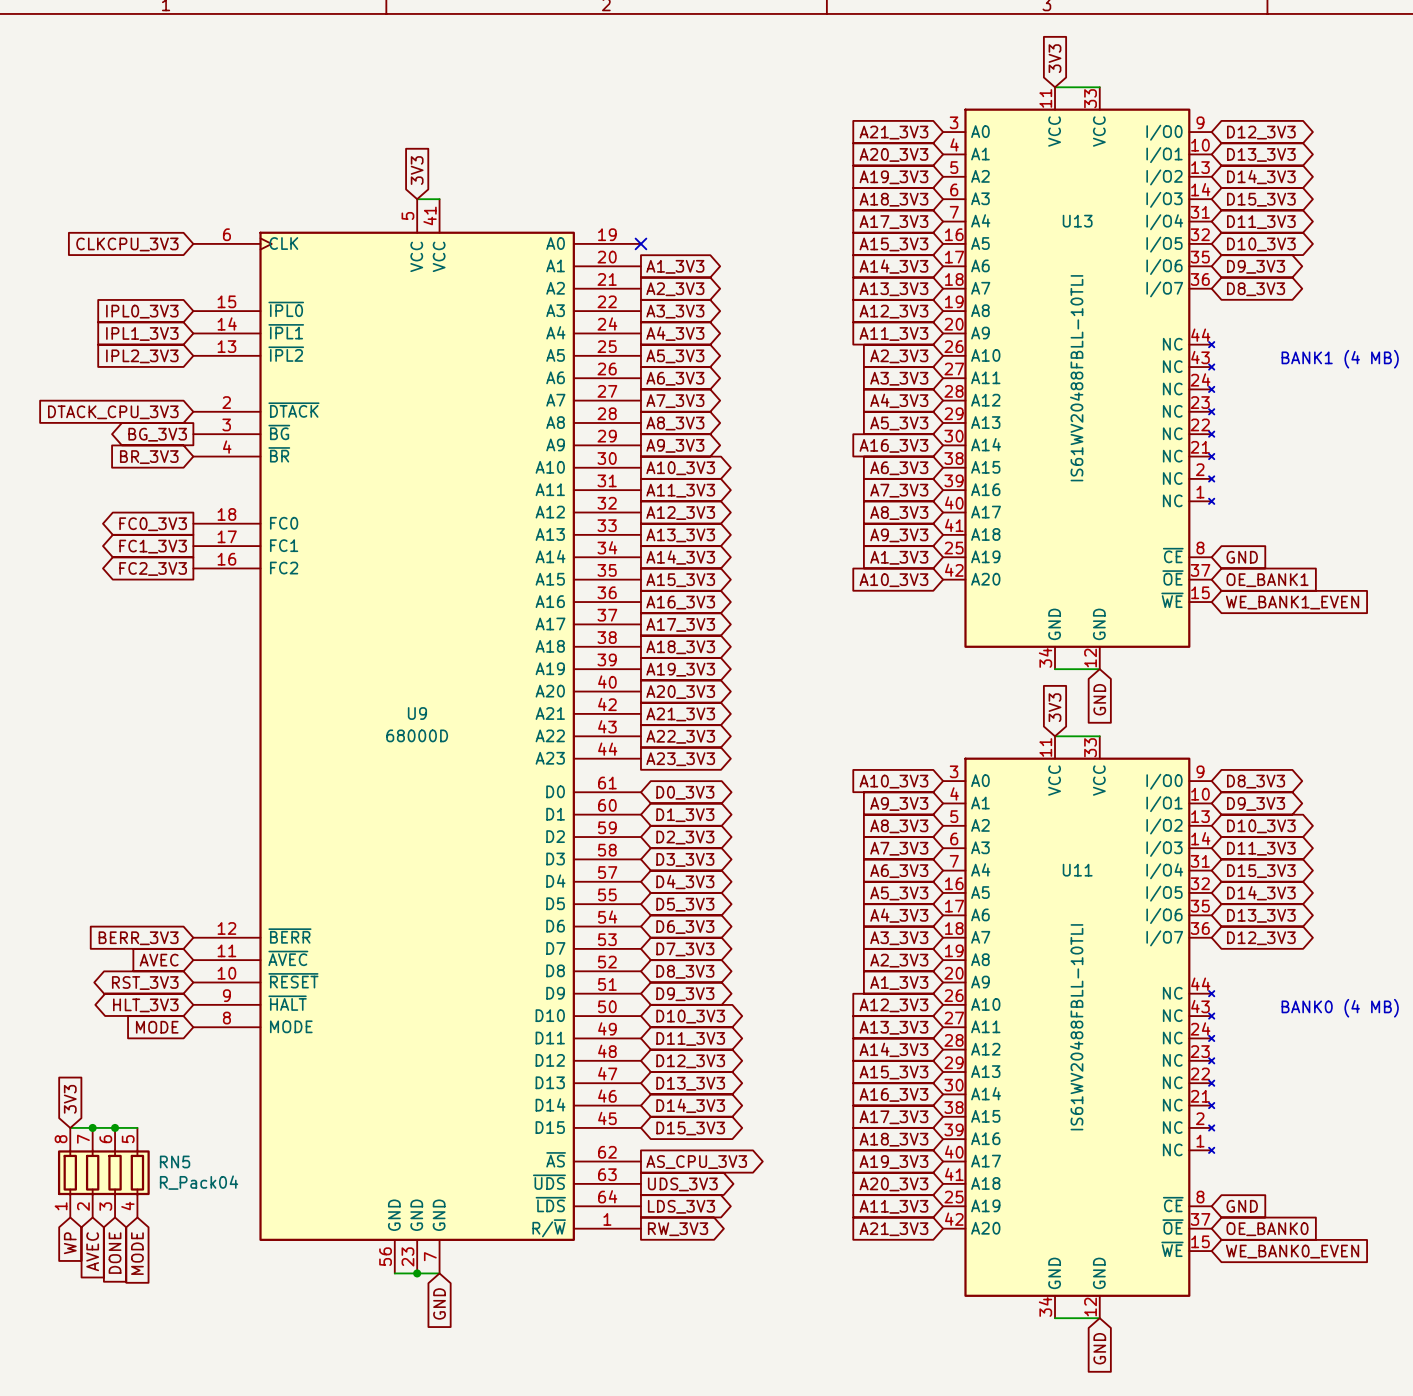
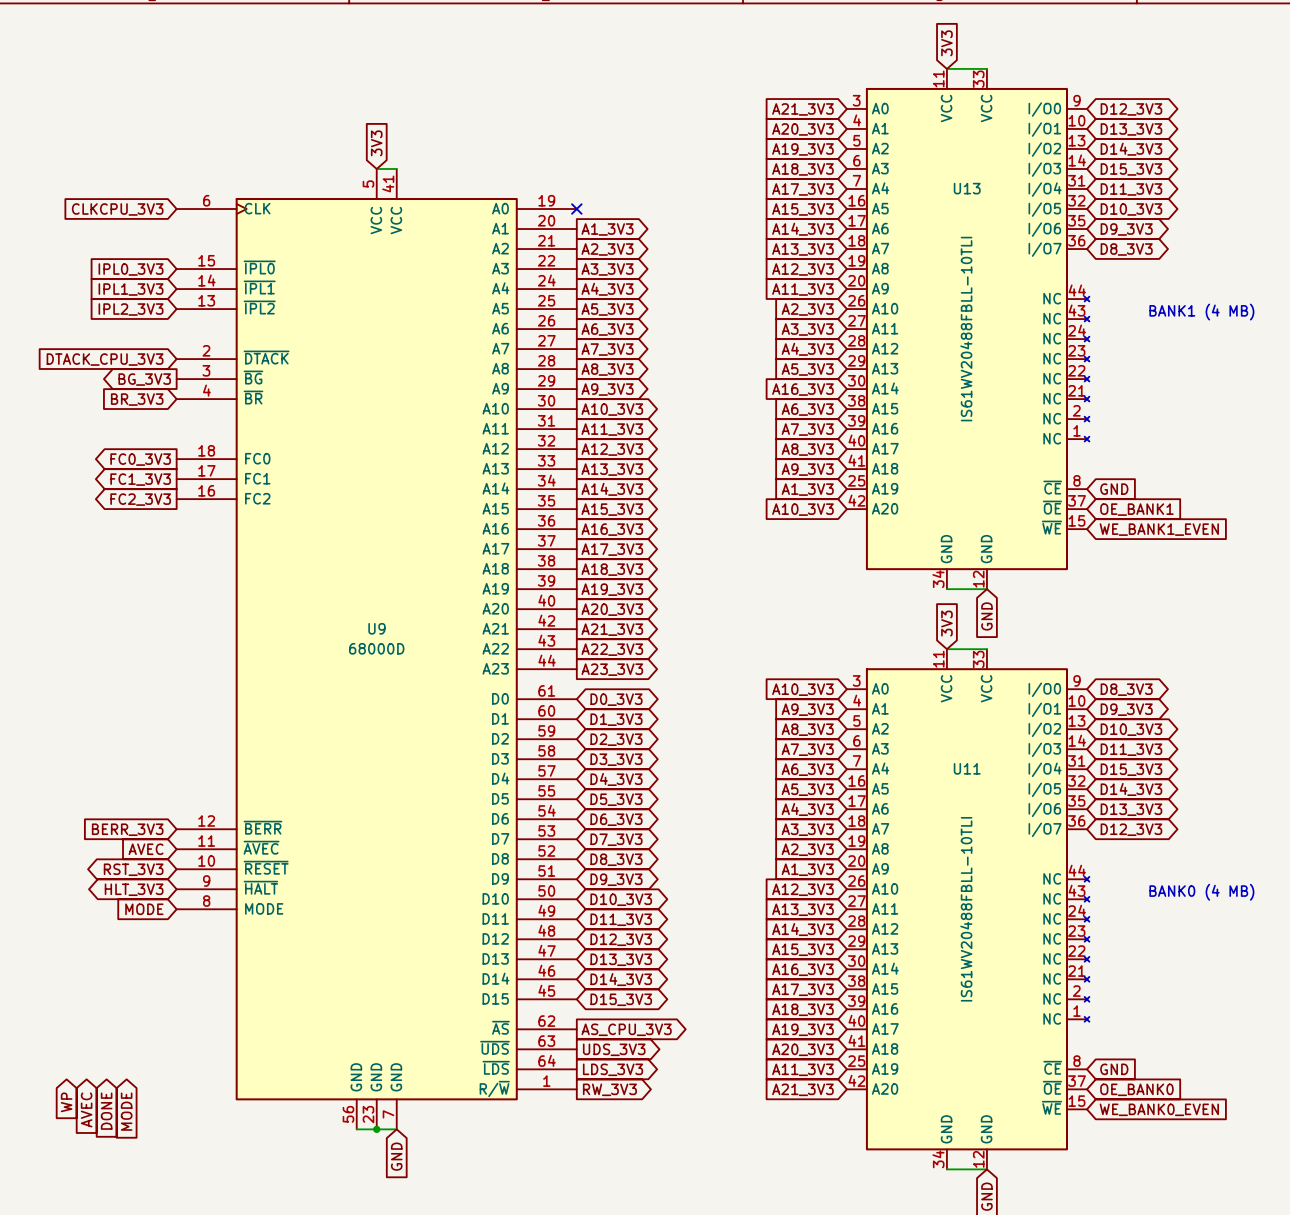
global label: 3V3 (70, 1099) -> none
wire: (70, 1127) (137, 1127) -> none
junction: (92, 1127) -> none
junction: (115, 1127) -> none
RN5: R_Pack04 (103, 1172) -> none

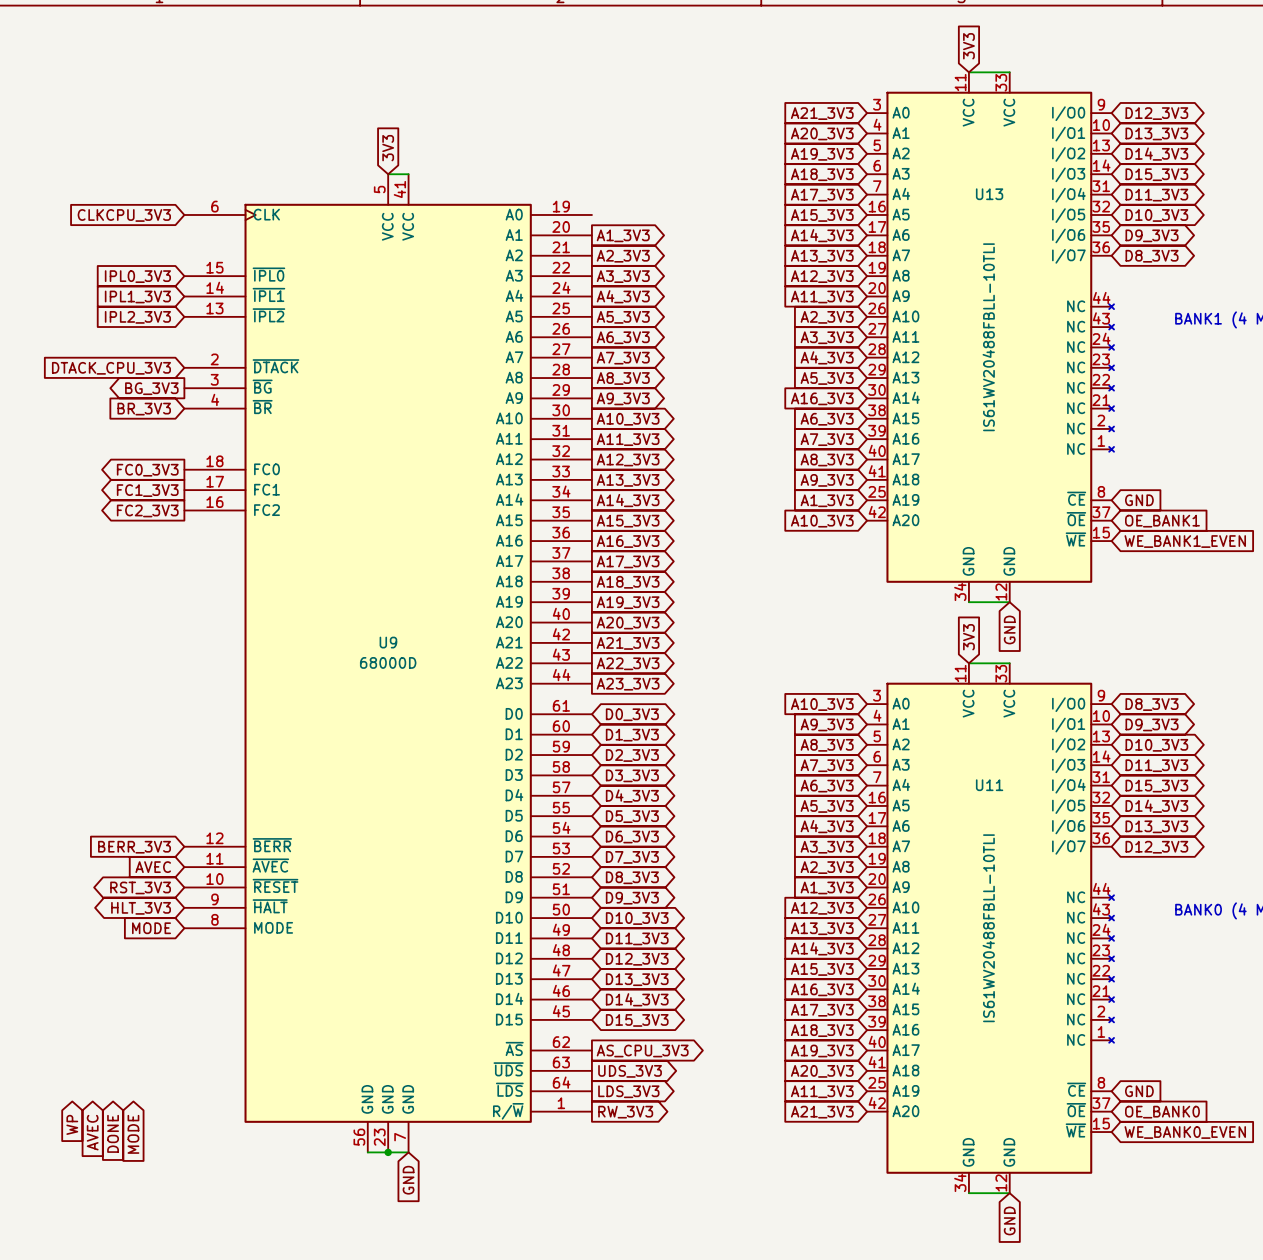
no-connect mark: (576, 209) -> none

